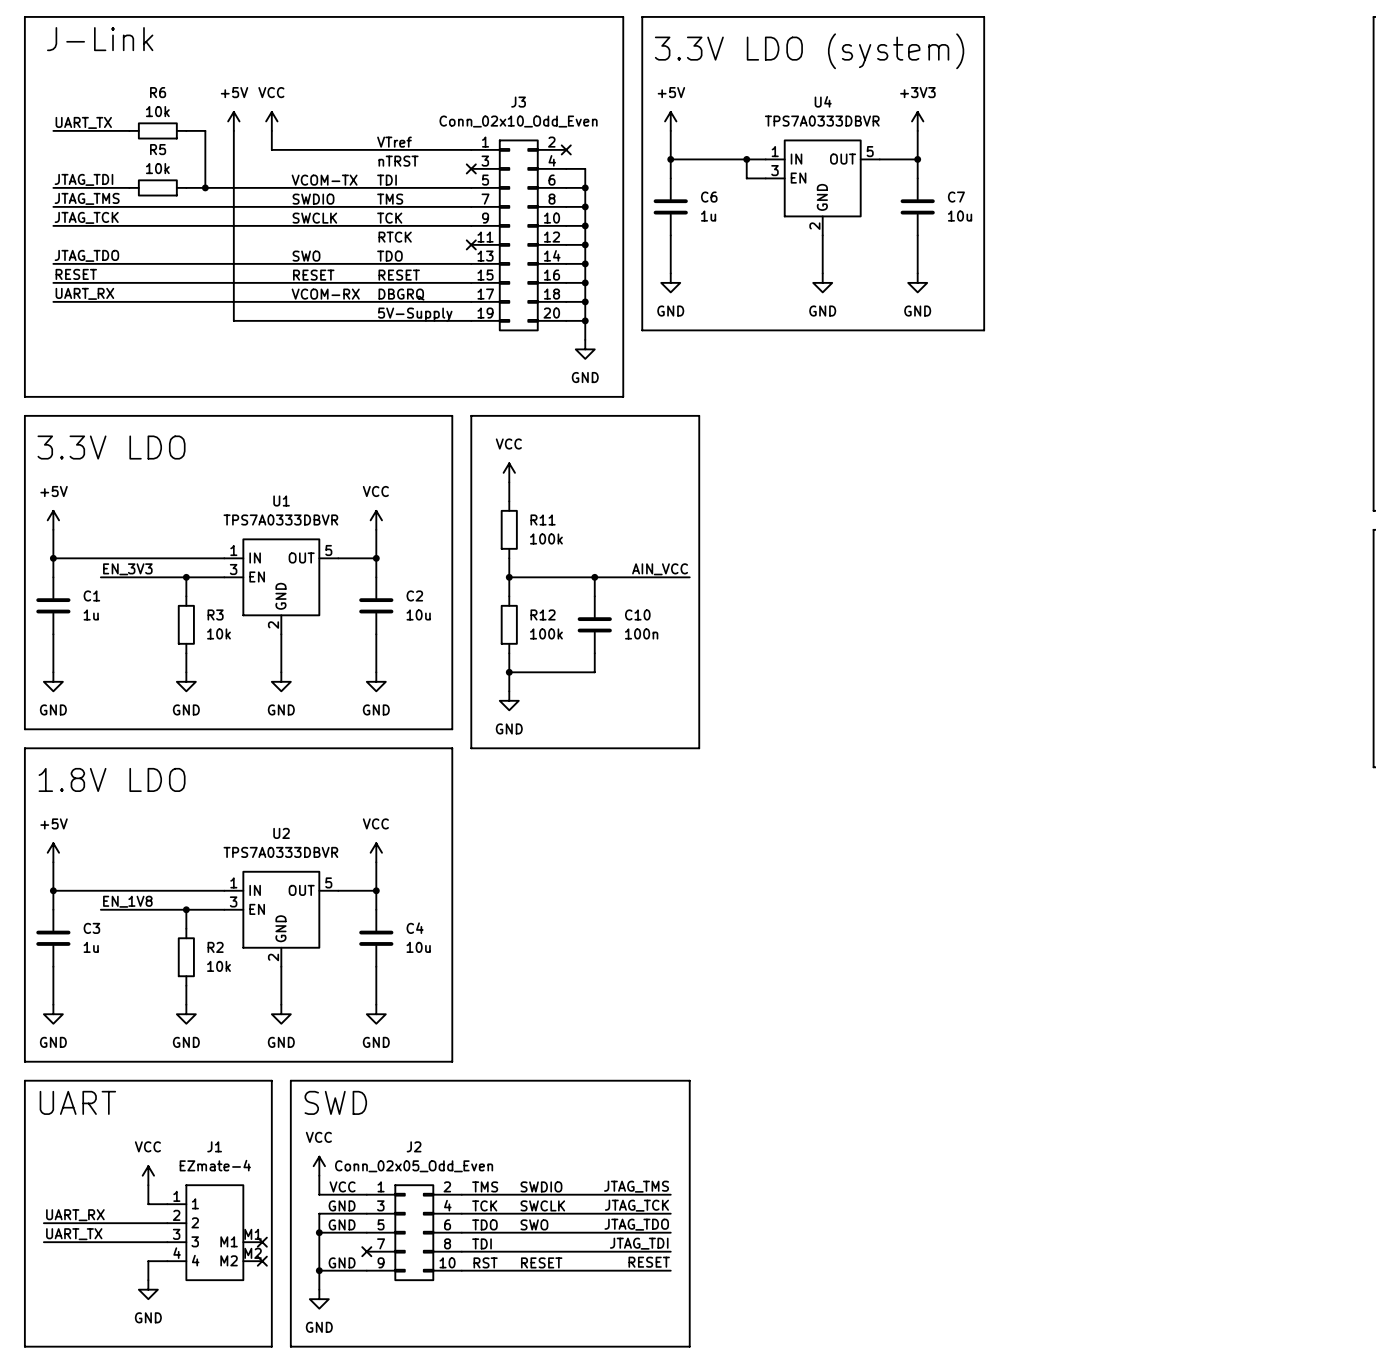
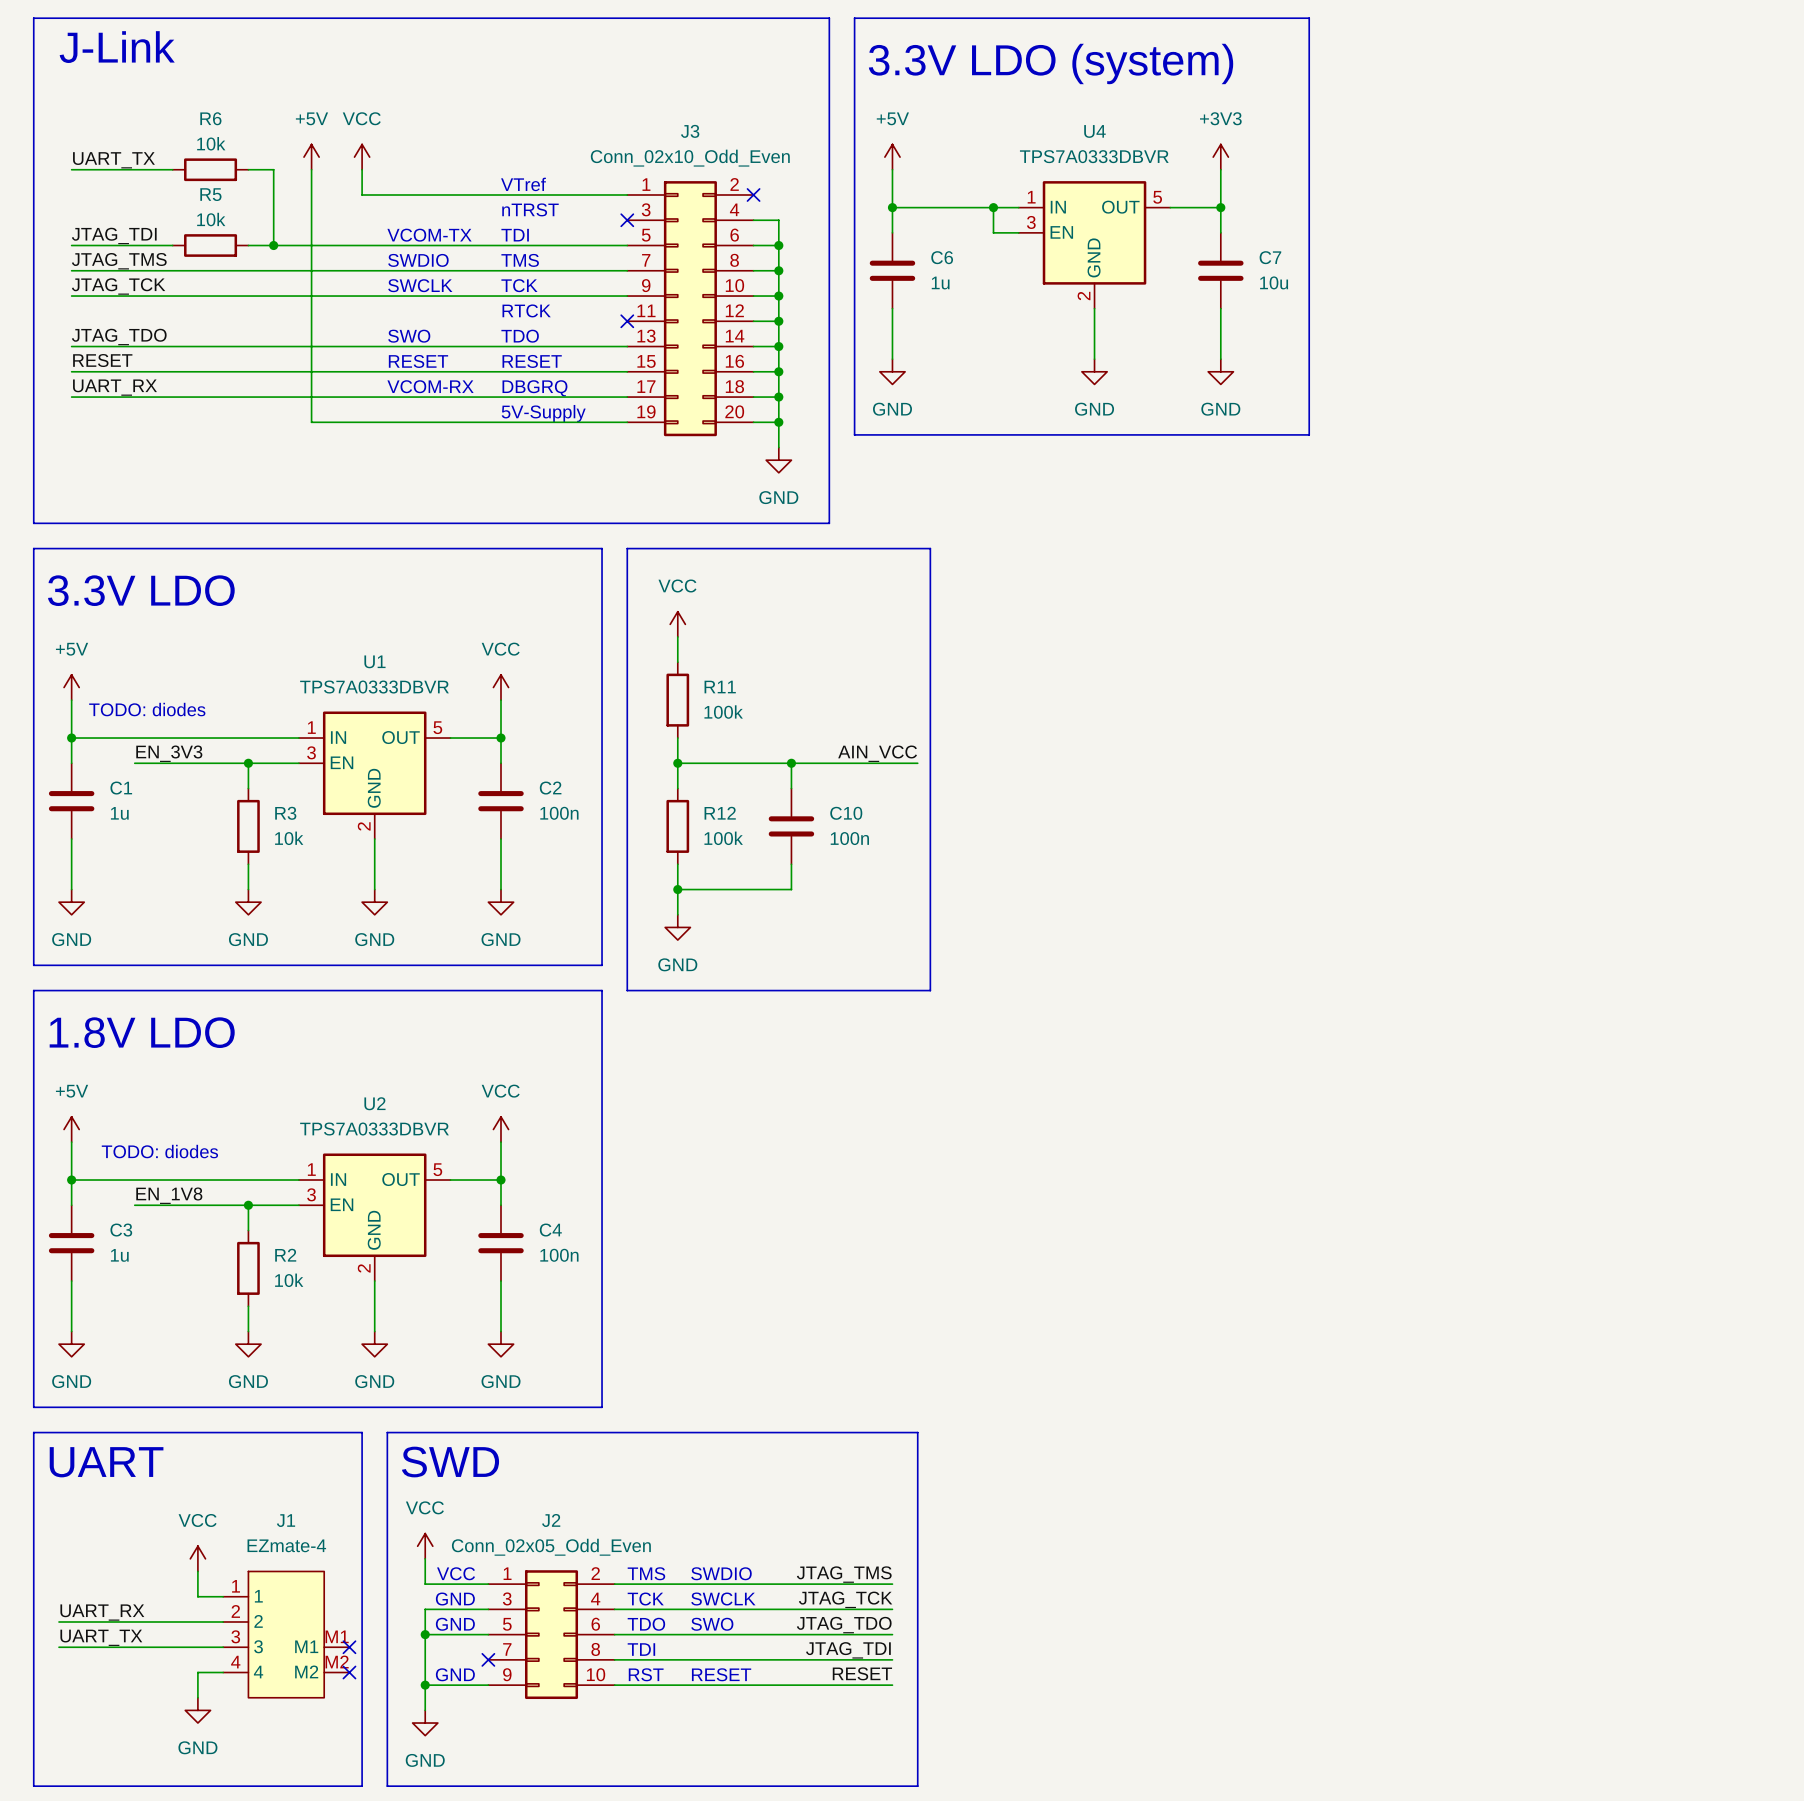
text: none -> TODO: diodes (147, 709)
C2 value: 10u (418, 614) -> 100n (559, 813)
text: none -> TODO: diodes (159, 1151)
C4 value: 10u (418, 947) -> 100n (559, 1255)

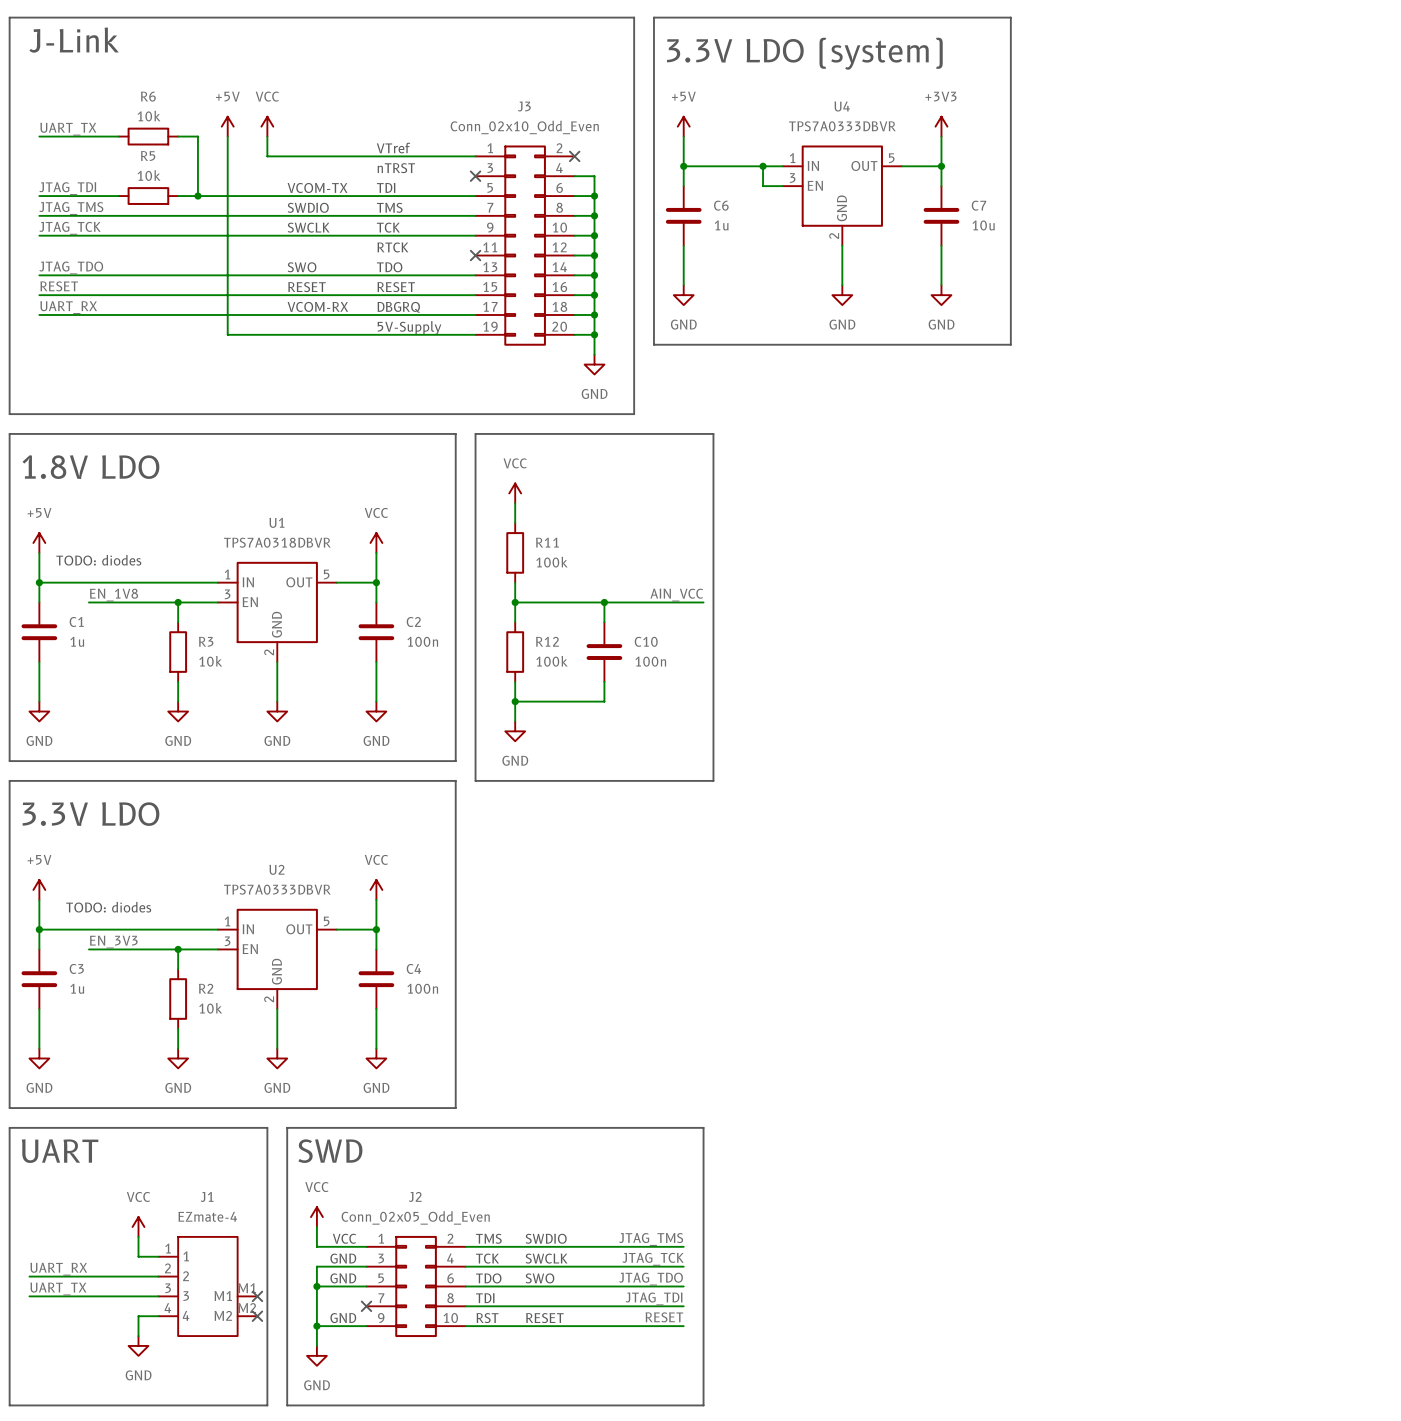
text: 3.3V LDO (141, 590) -> 1.8V LDO (90, 467)
U1 value: TPS7A0333DBVR (374, 687) -> TPS7A0318DBVR (277, 542)
label: EN_3V3 (169, 753) -> EN_1V8 (114, 595)
text: 1.8V LDO (142, 1032) -> 3.3V LDO (90, 814)
label: EN_1V8 (169, 1195) -> EN_3V3 (113, 942)

